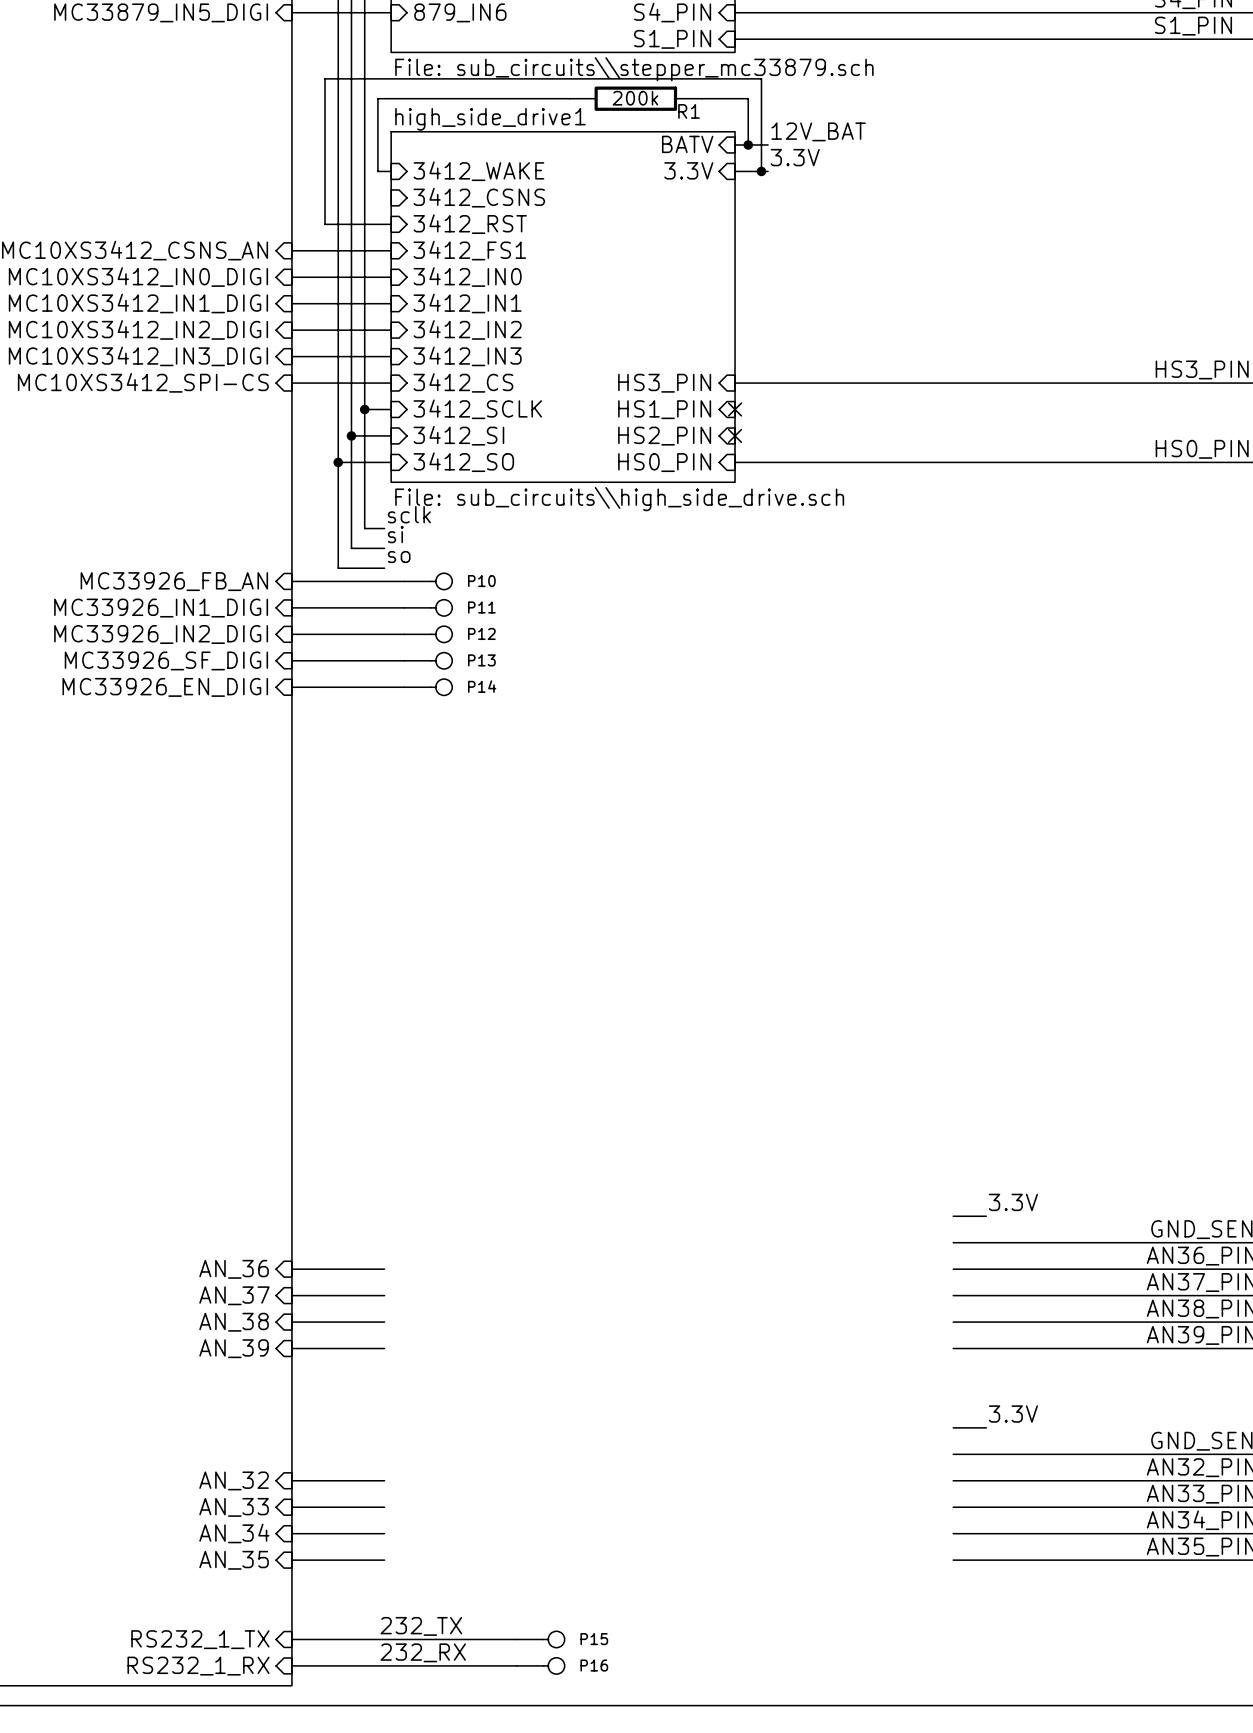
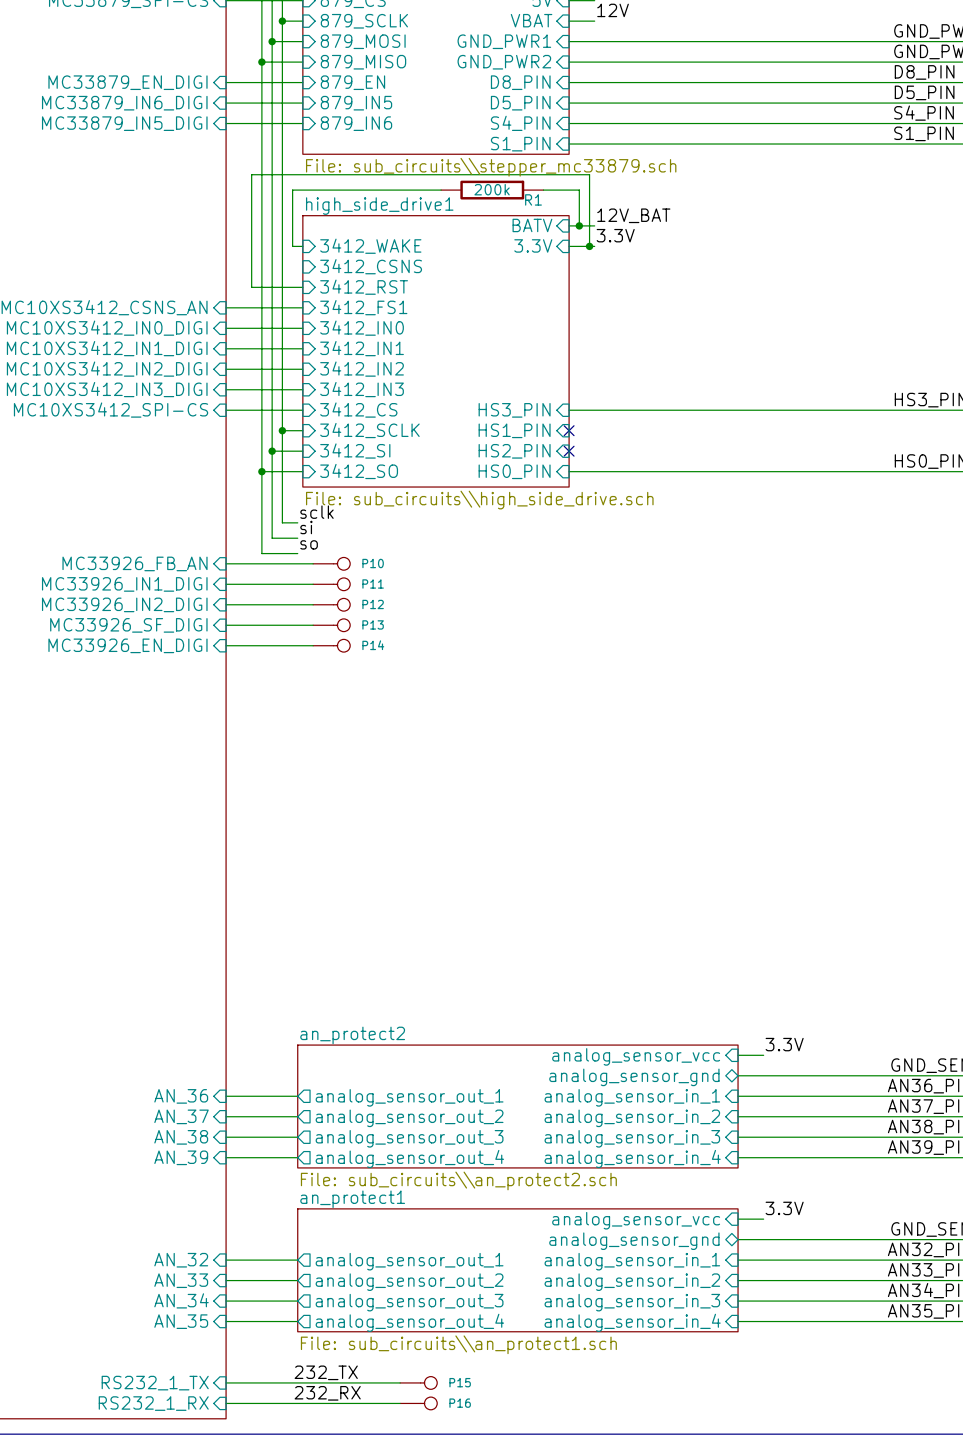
sheet pin: none -> analog_sensor_vcc (636, 1056)
sheet pin: none -> analog_sensor_gnd (634, 1077)
sheet pin: none -> analog_sensor_out_1 (409, 1097)
sheet pin: none -> analog_sensor_in_1 (632, 1097)
sheet an_protect2: none -> File: sub_circuits\\an_protect2.sch (517, 1106)
sheet pin: none -> analog_sensor_out_2 (409, 1118)
sheet pin: none -> analog_sensor_in_2 (632, 1118)
sheet pin: none -> analog_sensor_out_3 (409, 1138)
sheet pin: none -> analog_sensor_in_3 (632, 1138)
sheet pin: none -> analog_sensor_out_4 (409, 1158)
sheet pin: none -> analog_sensor_in_4 (632, 1158)
sheet pin: none -> analog_sensor_vcc (636, 1220)
sheet pin: none -> analog_sensor_gnd (634, 1241)
sheet pin: none -> analog_sensor_out_1 (409, 1261)
sheet pin: none -> analog_sensor_in_1 (632, 1261)
sheet an_protect1: none -> File: sub_circuits\\an_protect1.sch (517, 1270)
sheet pin: none -> analog_sensor_out_2 (409, 1282)
sheet pin: none -> analog_sensor_in_2 (632, 1282)
sheet pin: none -> analog_sensor_out_3 (409, 1302)
sheet pin: none -> analog_sensor_in_3 (632, 1302)
sheet pin: none -> analog_sensor_out_4 (409, 1322)
sheet pin: none -> analog_sensor_in_4 (632, 1322)

